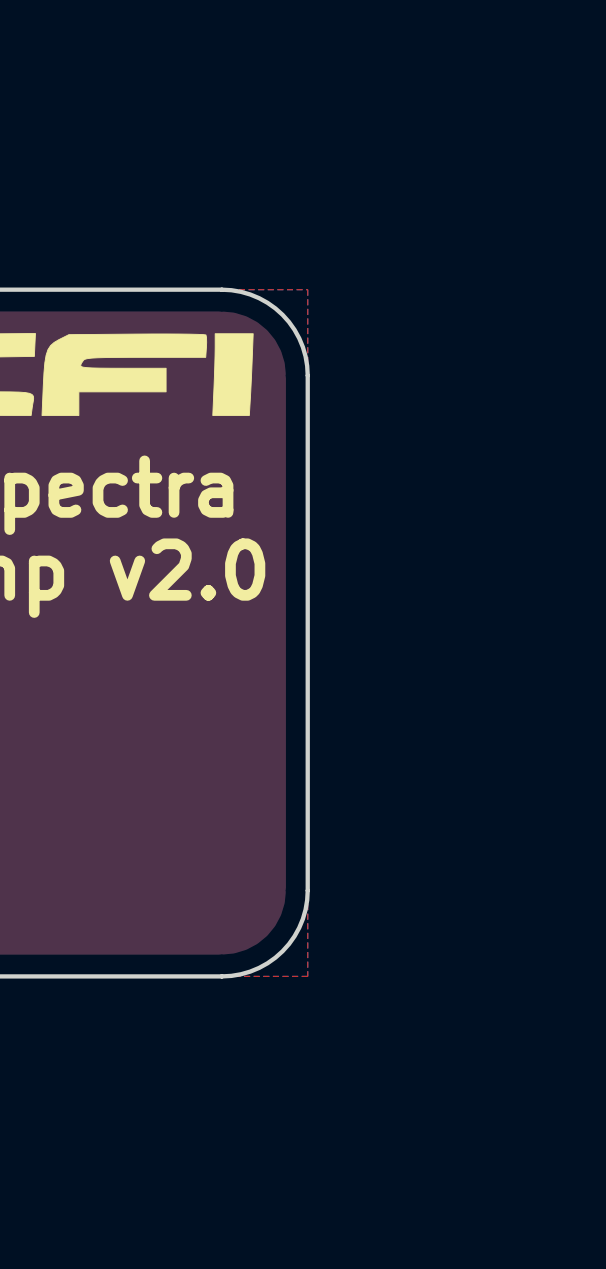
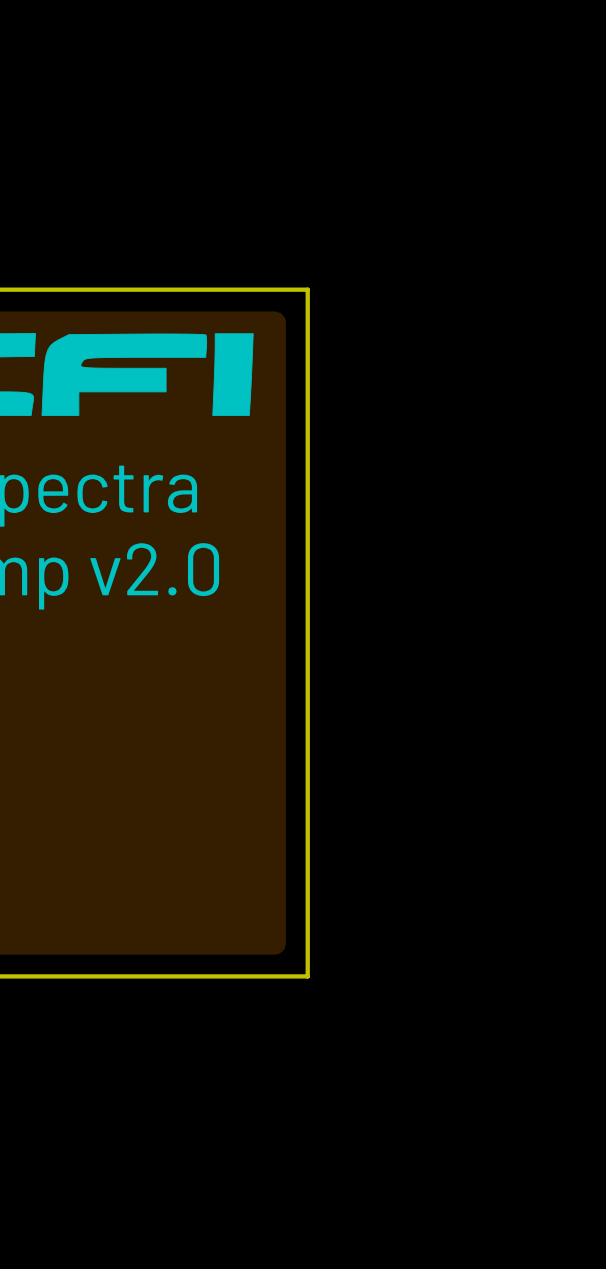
board edge: (221, 289) (250, 294) (267, 302) (282, 314) (294, 329) (302, 347) (307, 375) -> (221, 289) (307, 289) (307, 375)
board edge: (307, 890) (302, 918) (294, 936) (282, 951) (267, 963) (250, 971) (221, 976) -> (307, 890) (307, 976) (221, 976)

